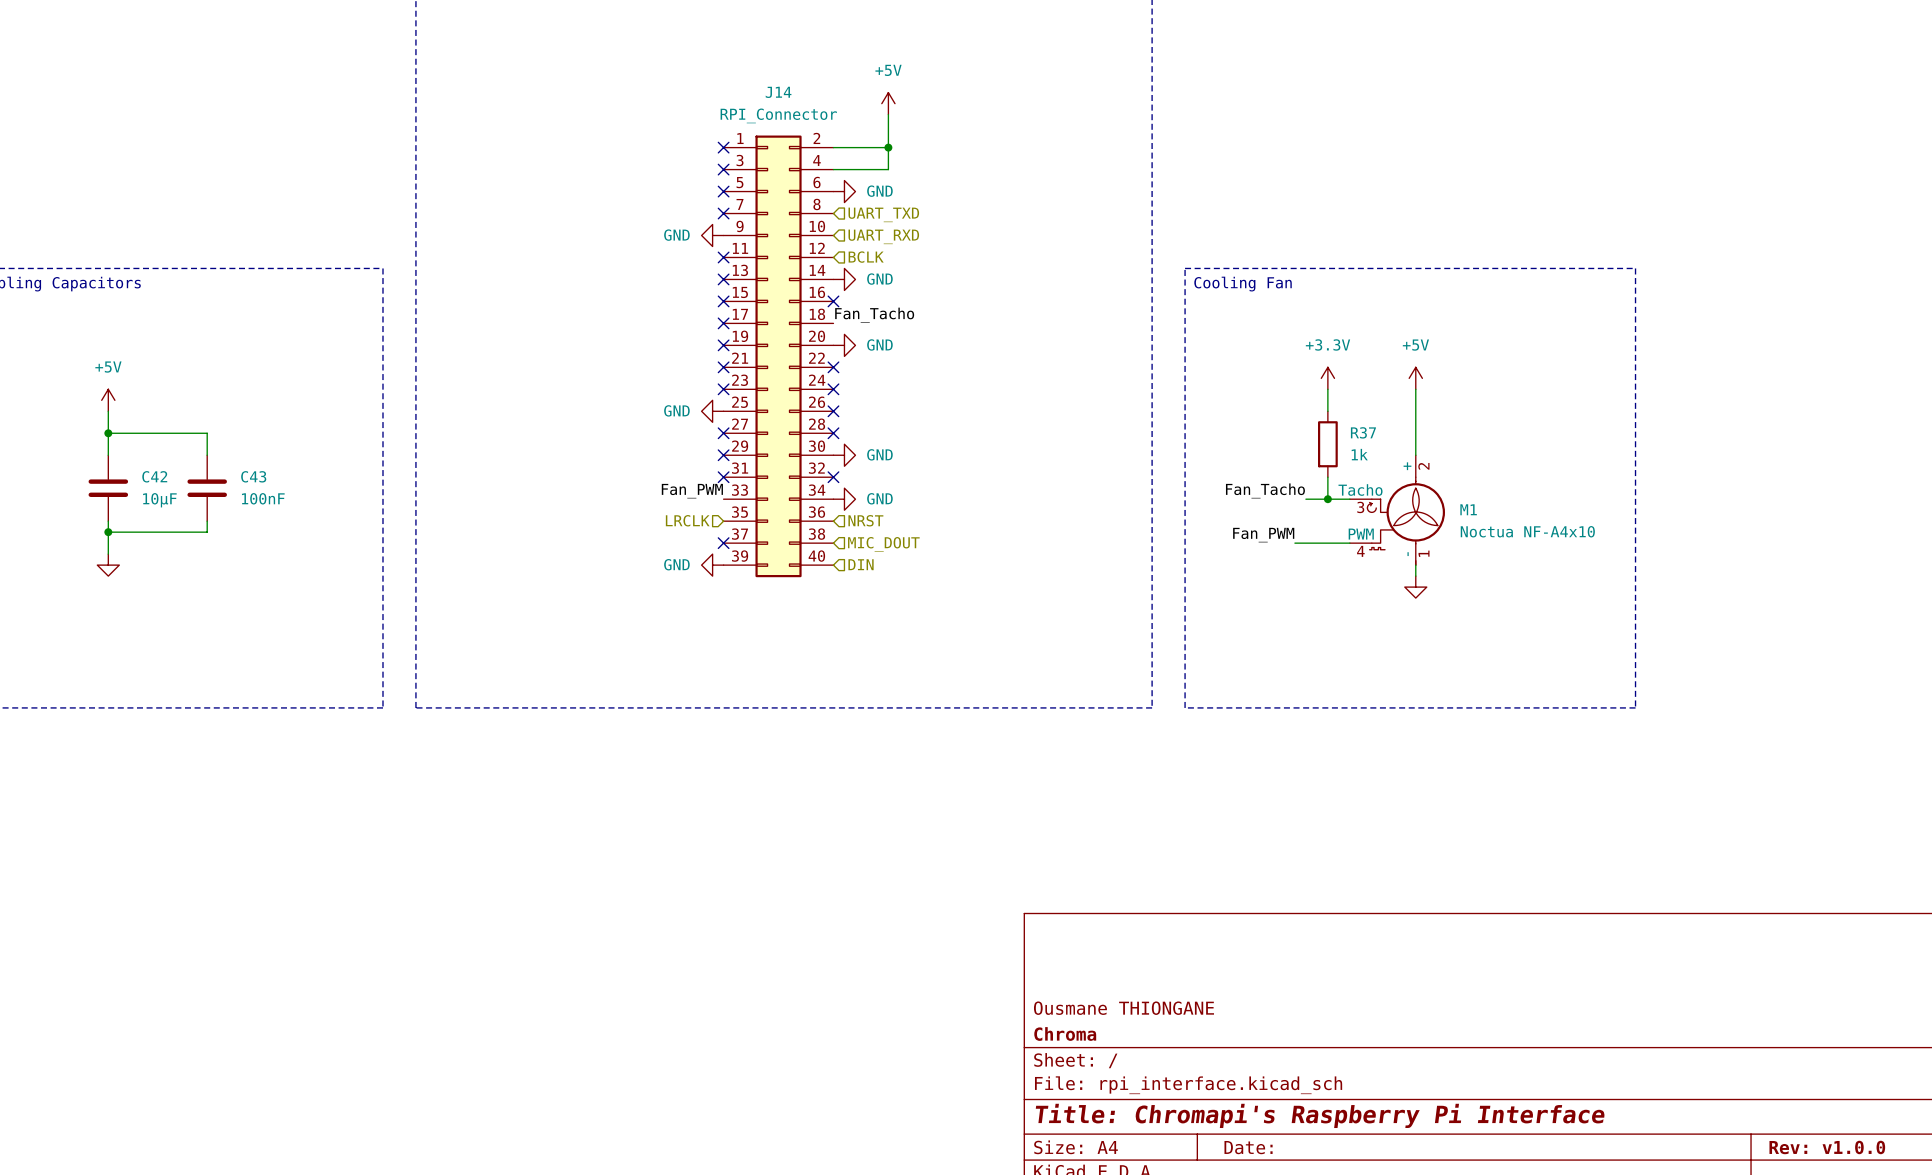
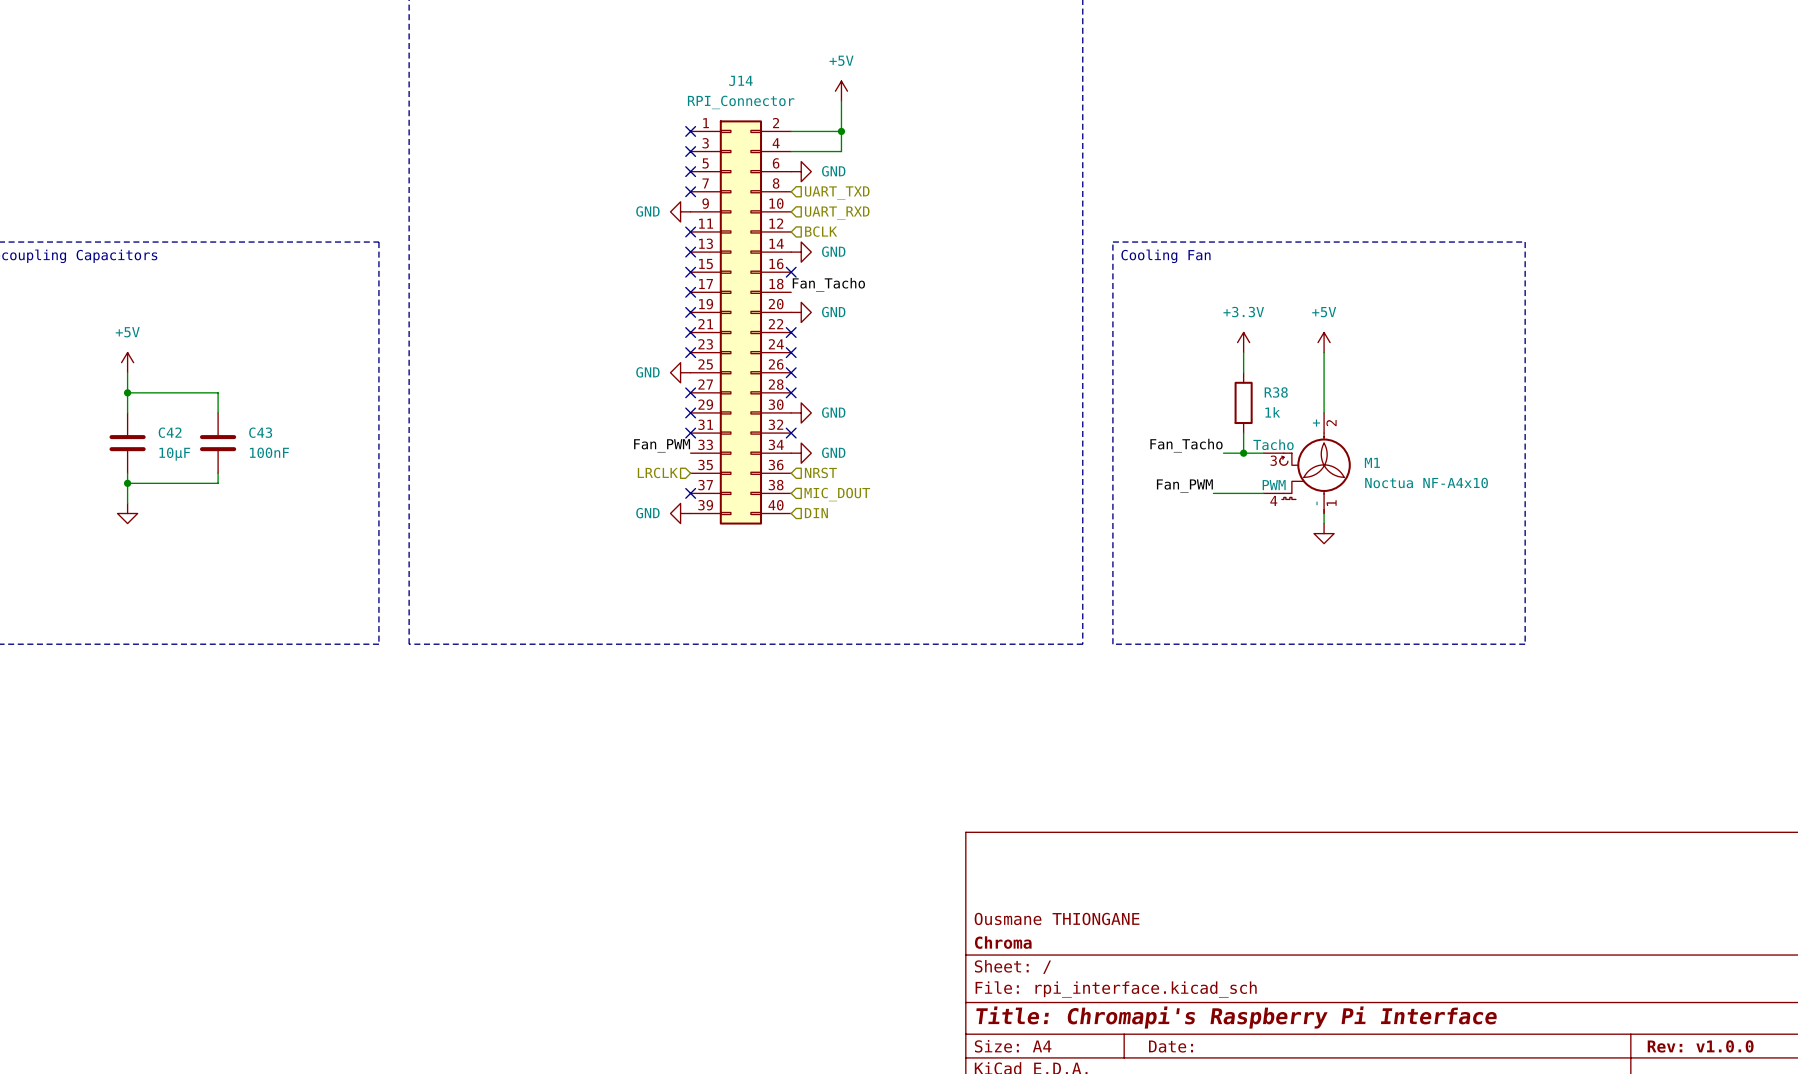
R37 name: R37 (1363, 432) -> R38 (1276, 392)

